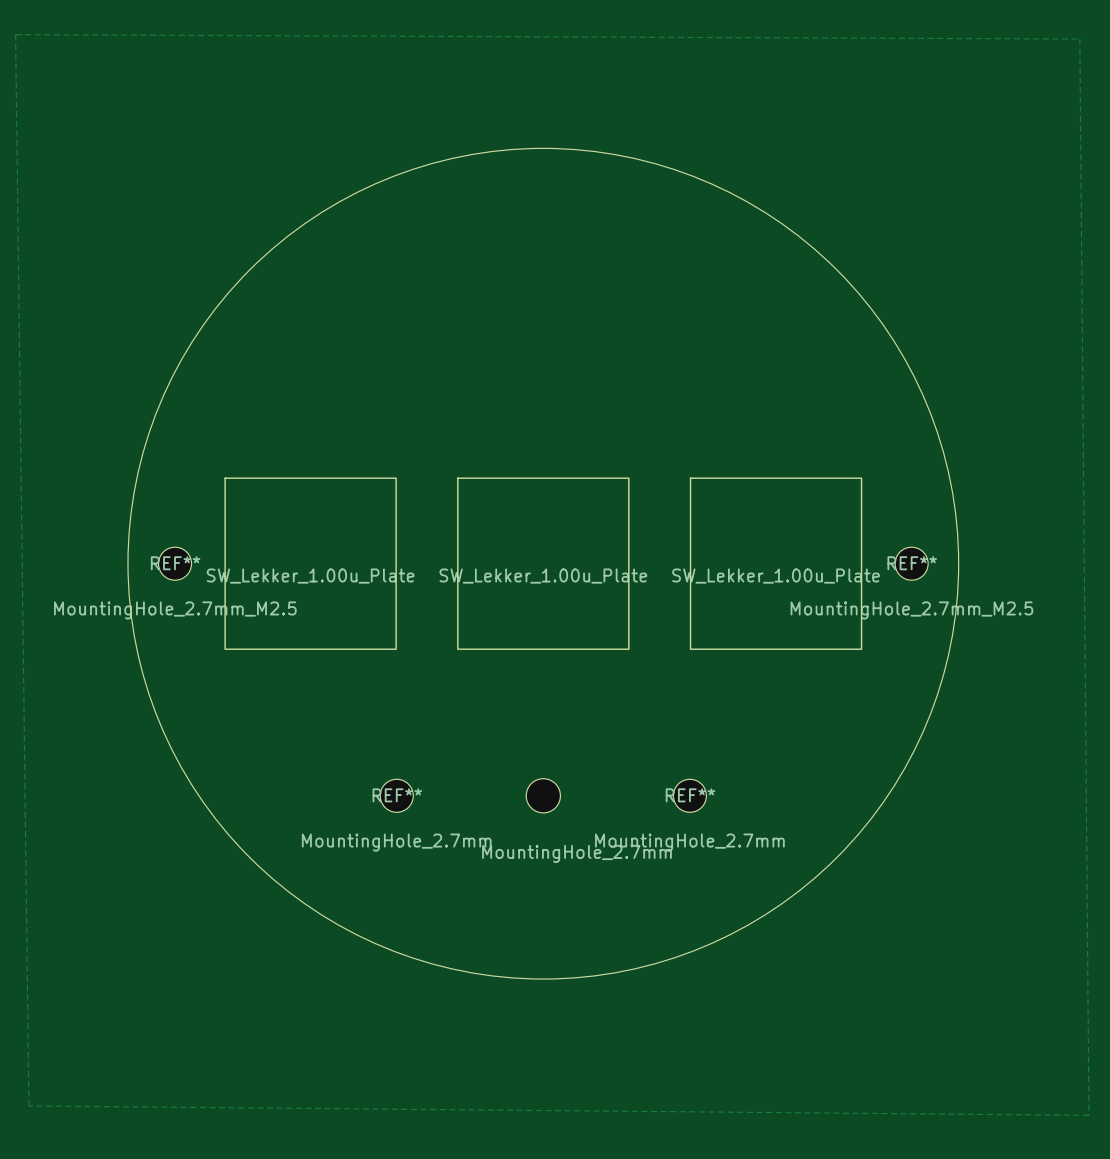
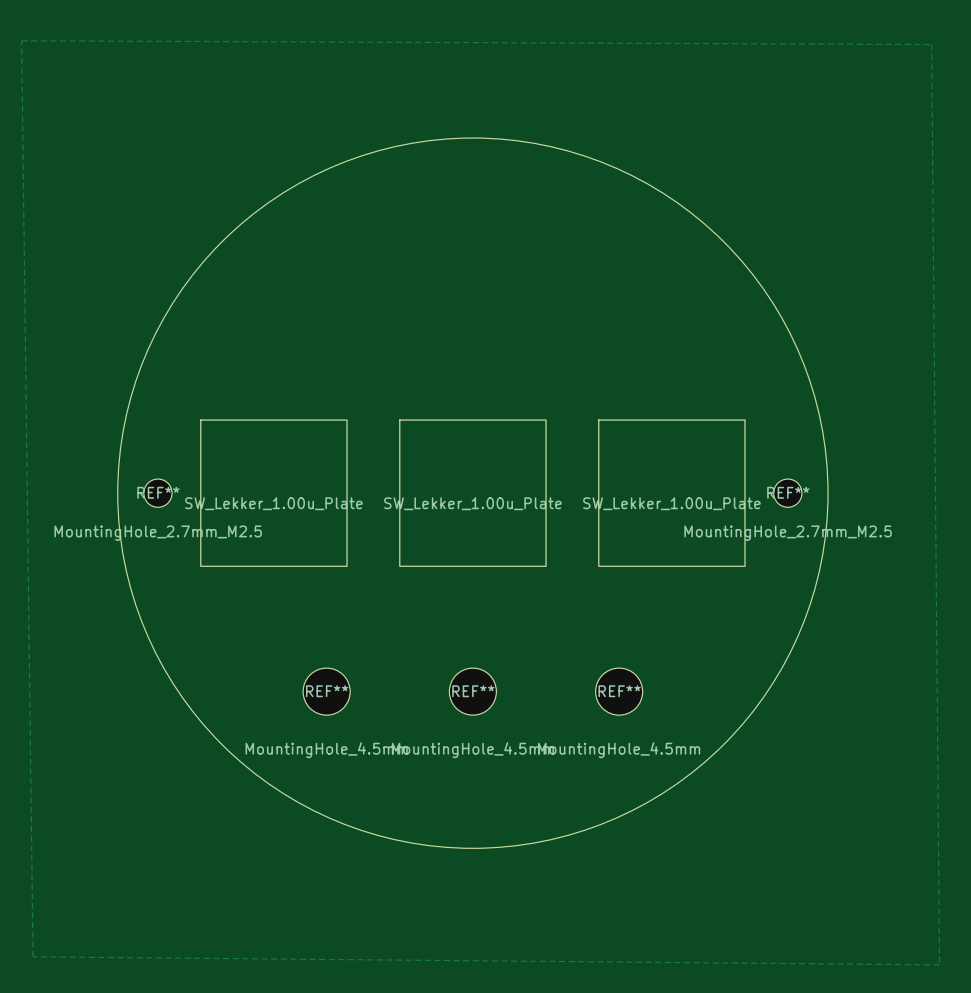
REF**: none -> MountingHole_4.5mm (326, 691)
REF**: MountingHole_2.7mm (396, 795) -> none
part: MountingHole_2.7mm (543, 795) -> none
REF**: none -> MountingHole_4.5mm (472, 691)
REF**: MountingHole_2.7mm (689, 795) -> none
REF**: none -> MountingHole_4.5mm (619, 691)

